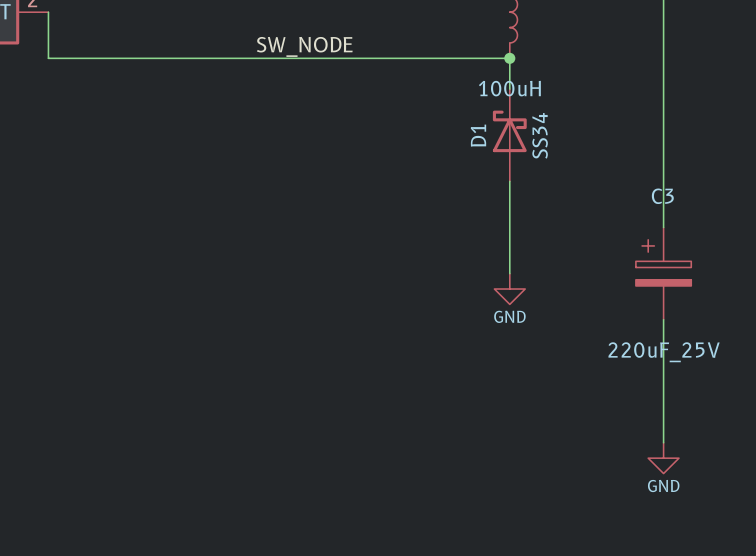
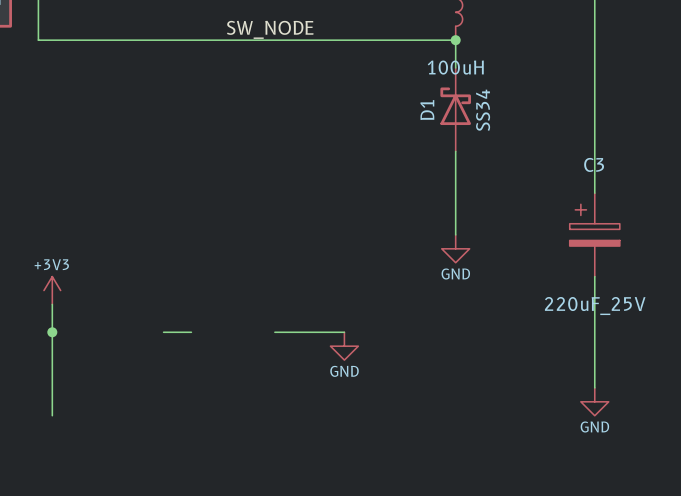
power symbol: none -> +3V3 (52, 290)
wire: none -> (52, 304) (52, 415)
junction: none -> (52, 332)
wire: none -> (163, 332) (191, 332)
wire: none -> (274, 332) (344, 332)
power symbol: none -> GND (344, 346)

